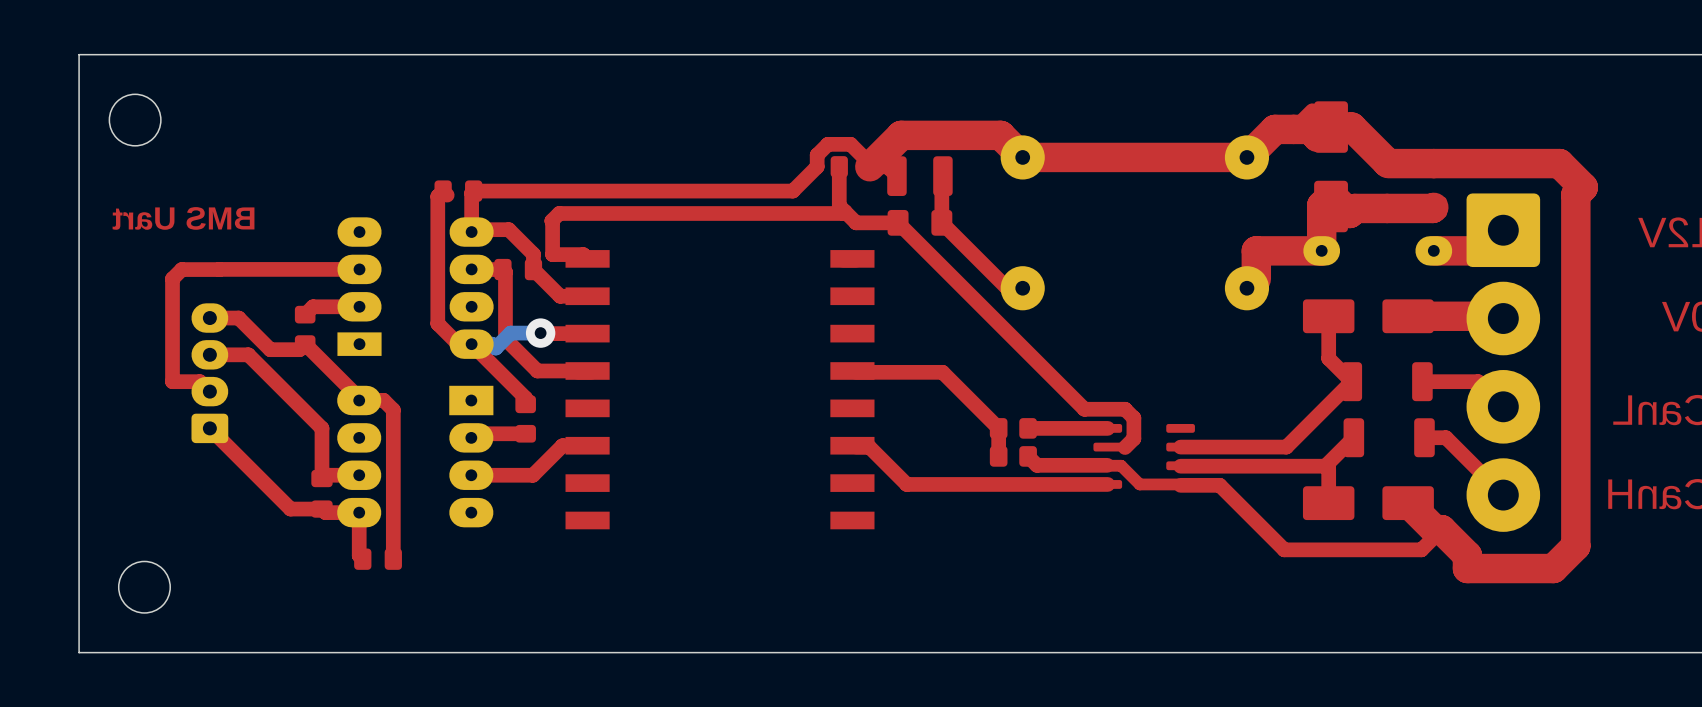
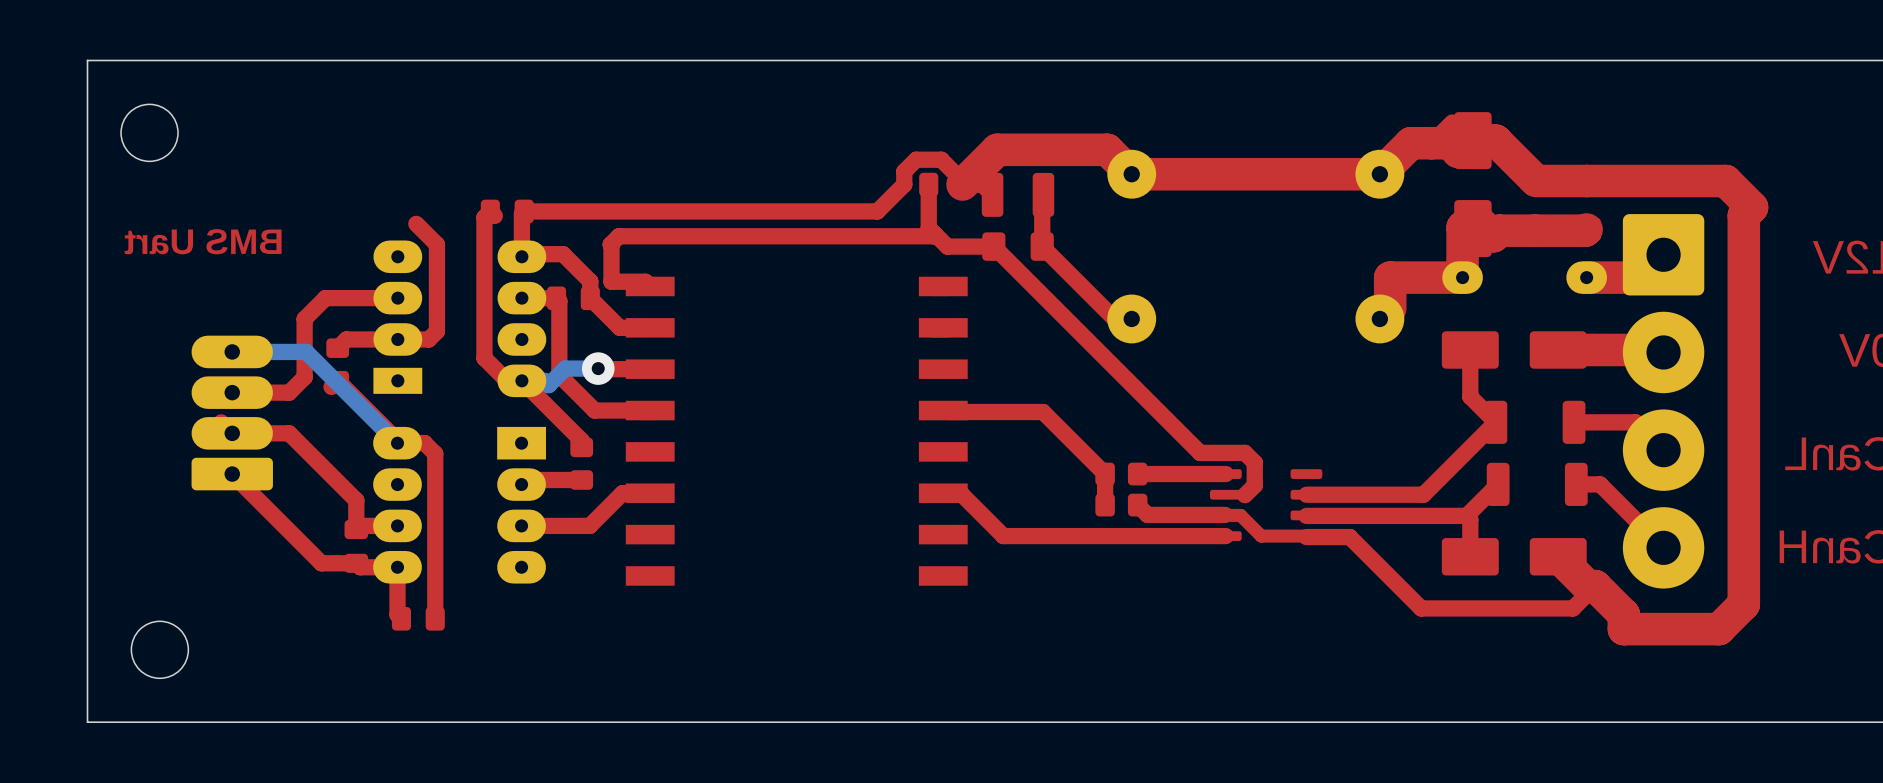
top track: none -> (416, 223) (436, 244) (436, 331) (428, 339) (397, 339)
top track: (219, 269) (181, 269) (172, 278) (172, 381) (199, 381) -> none
top track: (294, 269) (219, 269) -> (325, 298) (304, 318) (304, 377) (289, 392) (274, 392)
part footprint: [191, 303, 229, 444] -> [191, 335, 273, 491]
top track: (209, 318) (238, 318) (270, 349) (299, 349) -> none
bottom track: none -> (232, 351) (306, 351) (397, 443)
top track: (248, 354) (321, 428) (321, 452) -> (232, 433) (289, 433) (356, 500)

